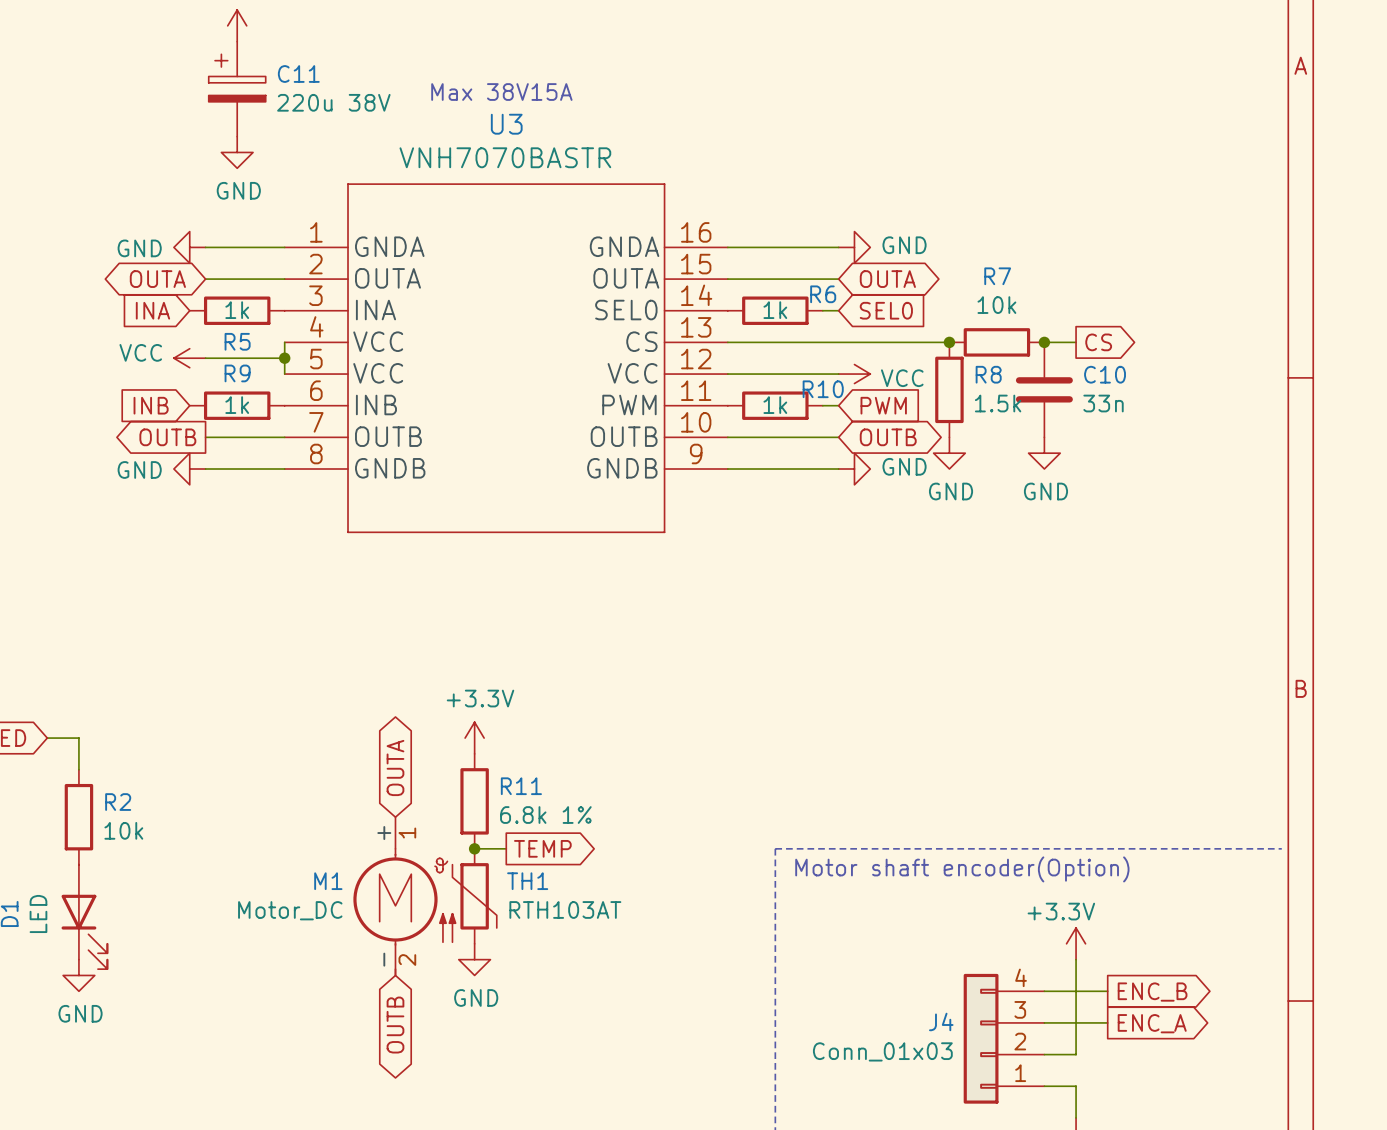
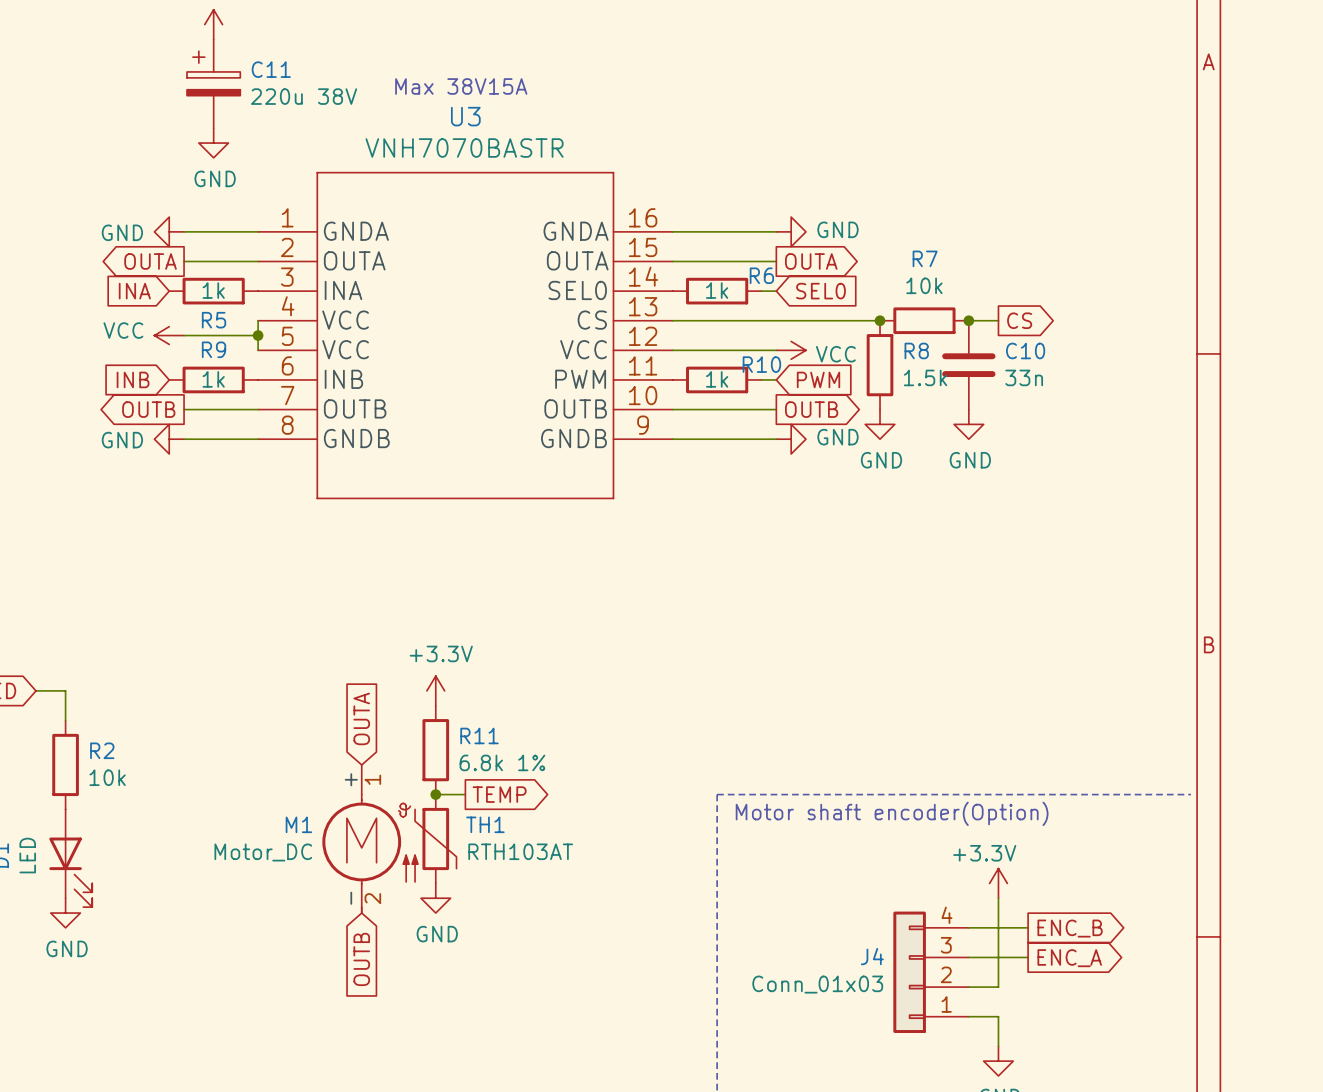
global label shape: bidirectional (157, 279) -> output (150, 261)
global label shape: bidirectional (887, 279) -> output (811, 261)
global label shape: bidirectional (888, 437) -> output (811, 409)
global label shape: bidirectional (395, 767) -> input (361, 718)
global label shape: bidirectional (395, 1025) -> input (361, 959)

